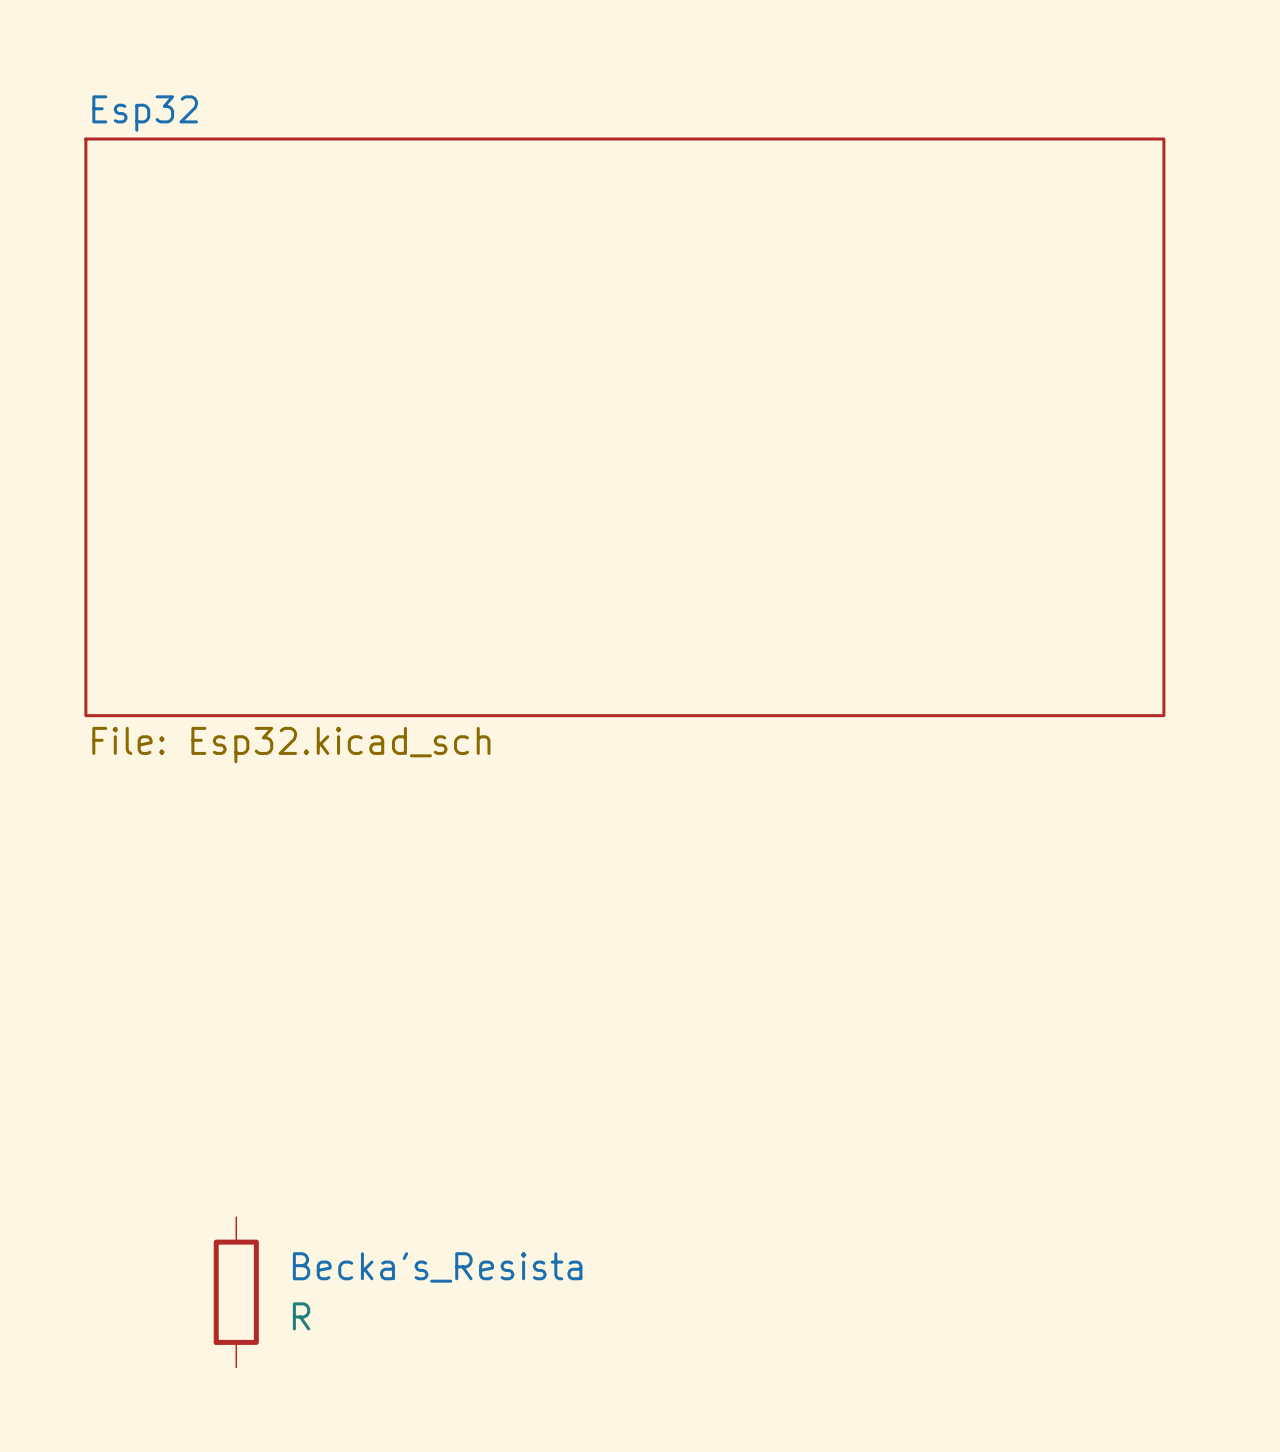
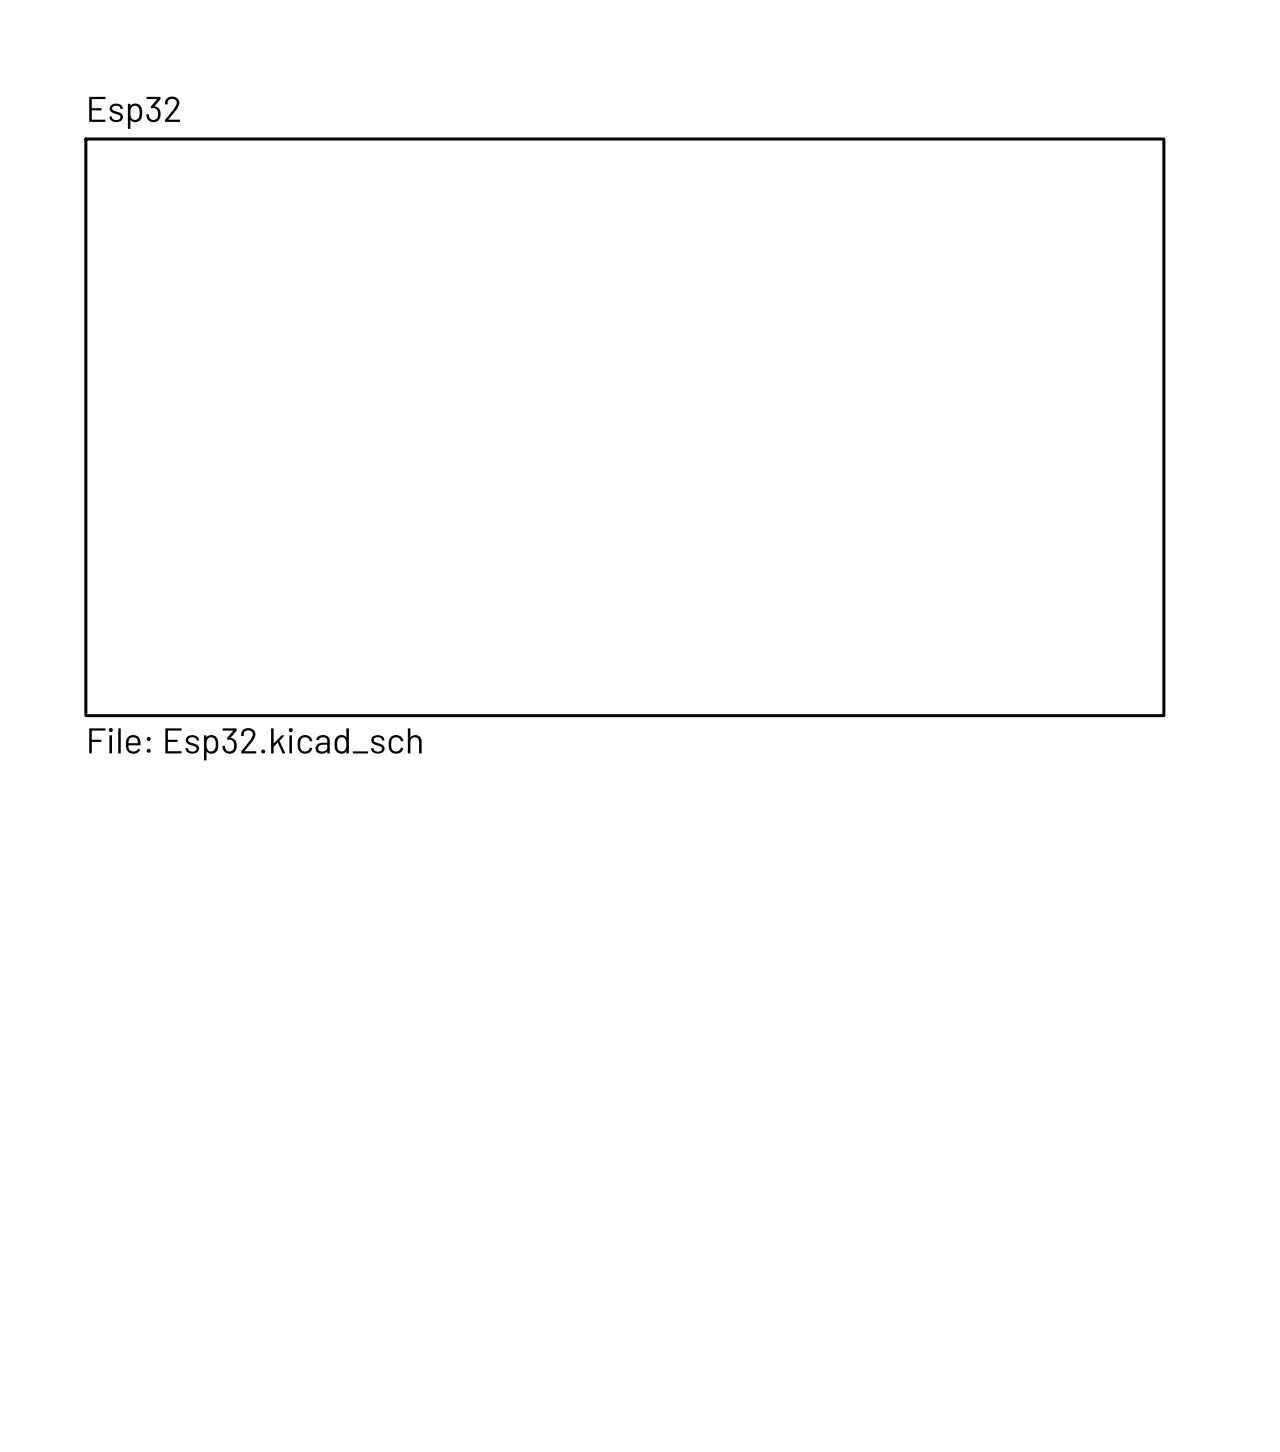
Becka's_Resista: R (236, 1292) -> none

